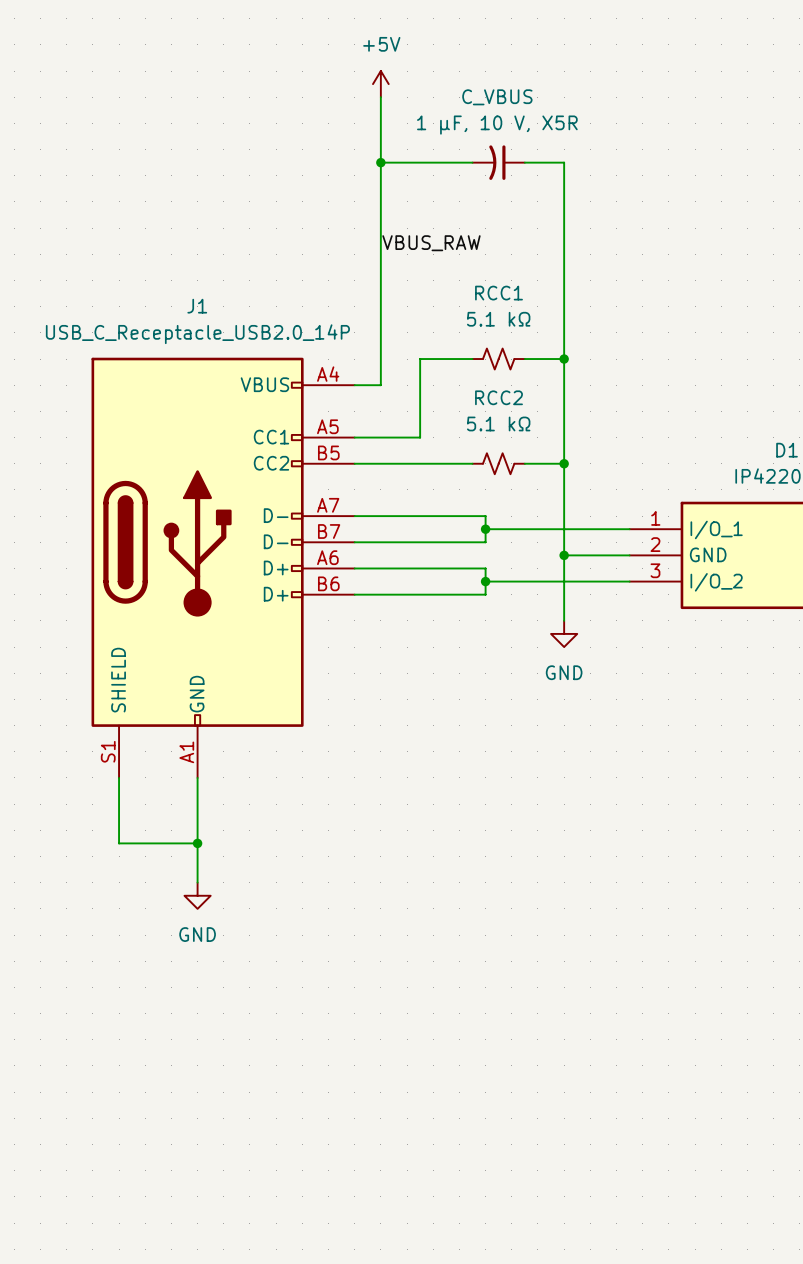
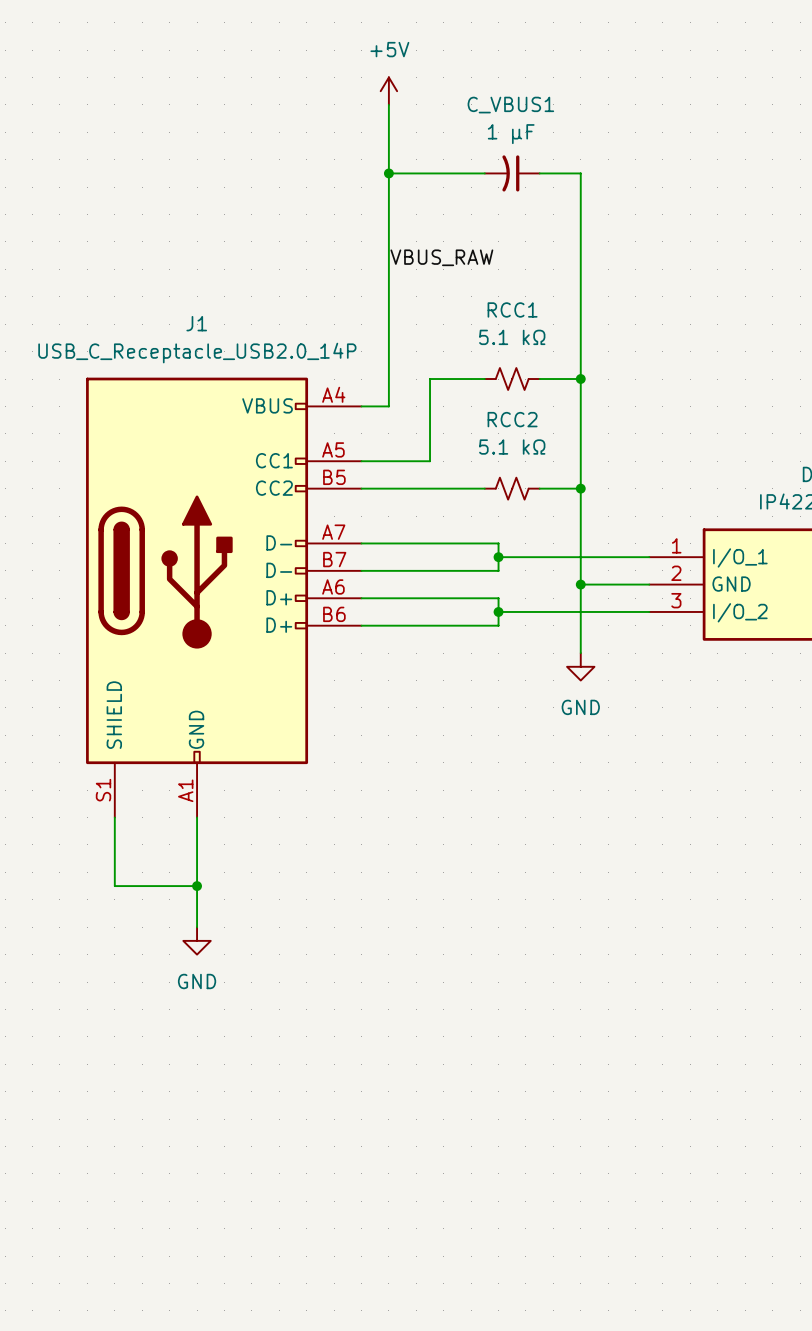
C_VBUS name: C_VBUS (497, 97) -> C_VBUS1 (510, 105)
C_VBUS value: 1 µF, 10 V, X5R (497, 125) -> 1 µF (511, 134)

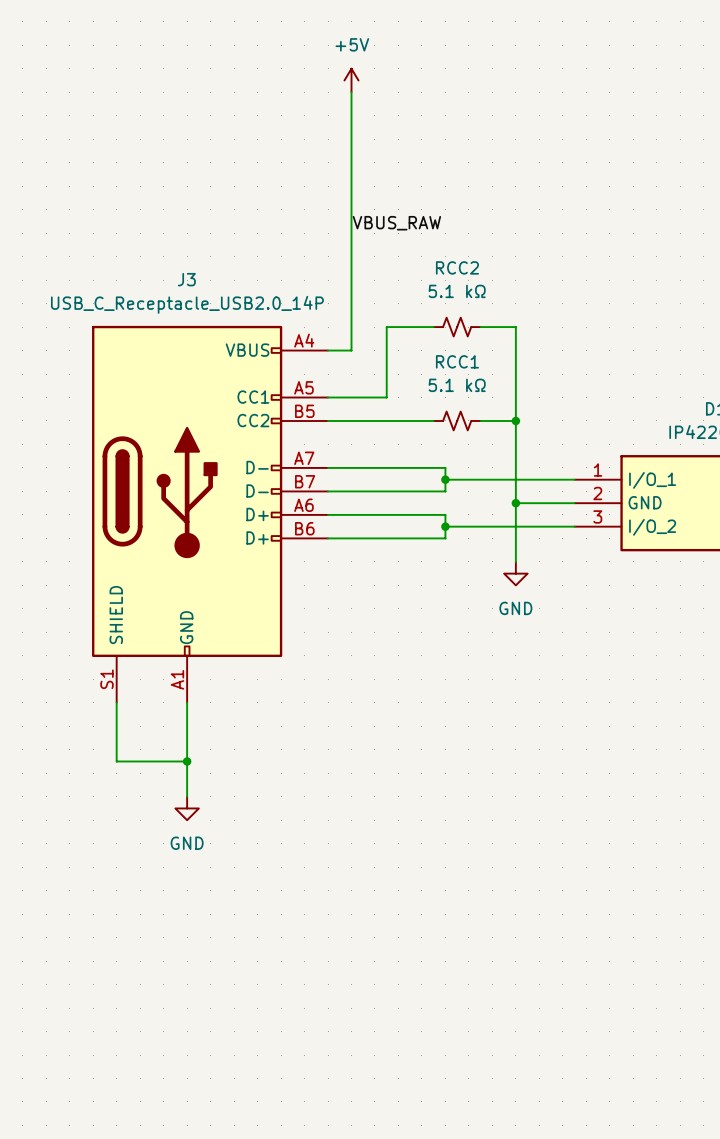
wire: (388, 173) (484, 173) -> none
junction: (388, 173) -> none
C_VBUS1: 1 µF (512, 173) -> none
wire: (539, 173) (580, 173) (580, 379) -> none
RCC1 name: RCC1 (512, 309) -> RCC2 (457, 267)
J1 name: J1 (196, 323) -> J3 (186, 279)
junction: (580, 379) -> none
RCC2 name: RCC2 (512, 419) -> RCC1 (457, 361)

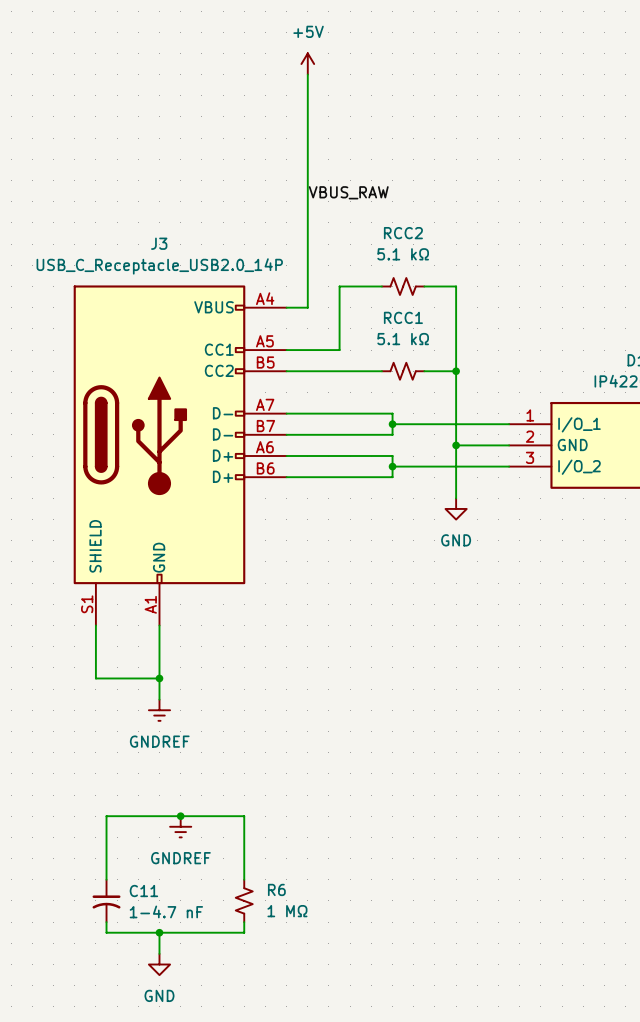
power symbol: none -> GNDREF (159, 710)
power symbol: GND (187, 808) -> none
junction: none -> (180, 816)
power symbol: none -> GNDREF (180, 826)
wire: none -> (106, 879) (106, 816) (244, 816) (244, 879)
C11: none -> 1-4.7 nF (106, 900)
R6: none -> 1 MΩ (244, 900)
wire: none -> (106, 922) (106, 932) (244, 932) (244, 922)
wire: none -> (159, 932) (159, 953)
junction: none -> (159, 932)
power symbol: none -> GND (159, 964)

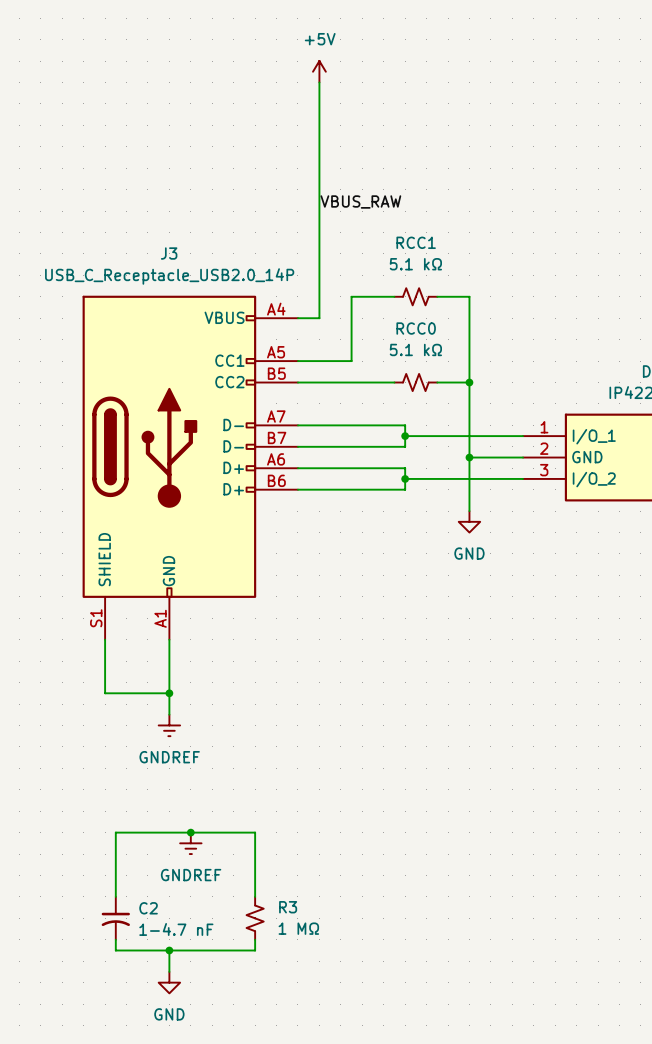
RCC2 name: RCC2 (403, 233) -> RCC1 (416, 242)
RCC1 name: RCC1 (403, 317) -> RCC0 (416, 328)
R6 name: R6 (276, 889) -> R3 (288, 907)
C11 name: C11 (143, 891) -> C2 (148, 908)

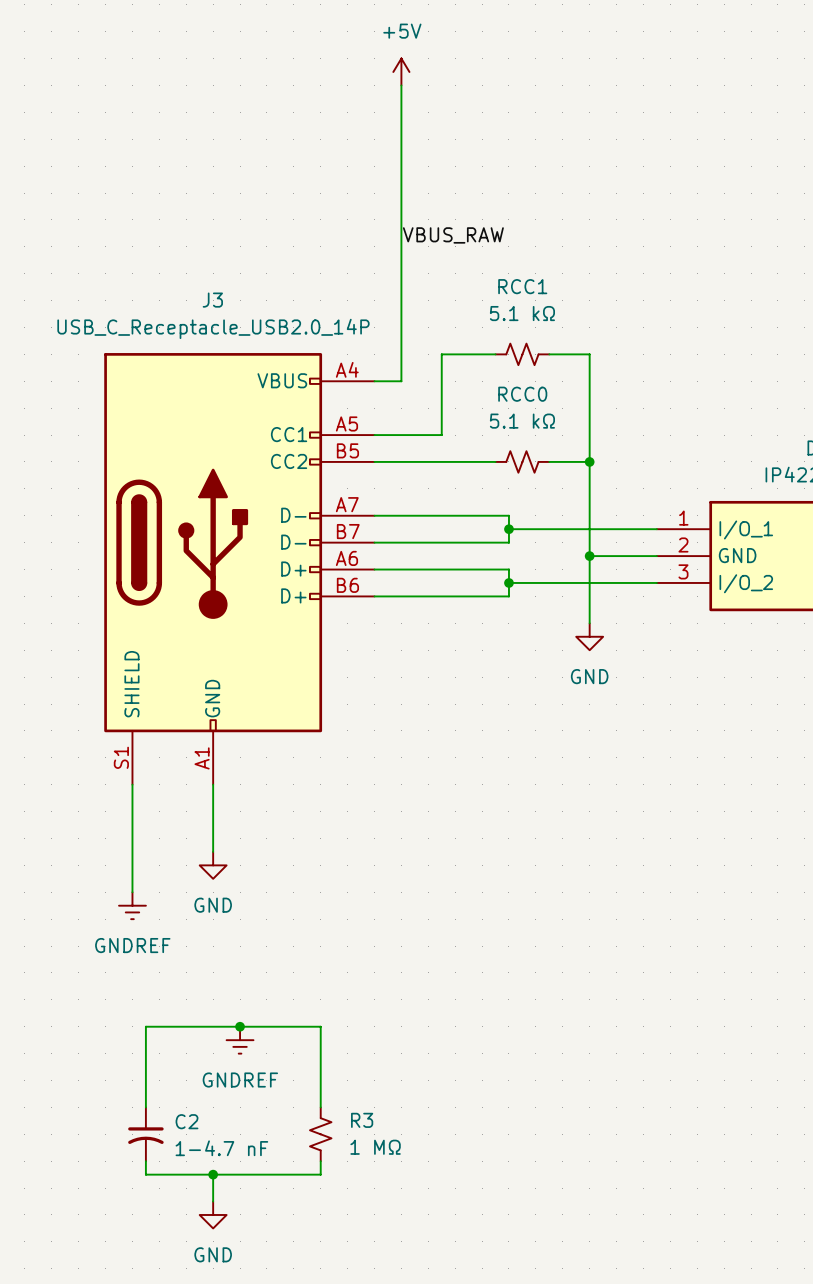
wire: (105, 693) (169, 693) (169, 714) -> (132, 851) (132, 892)
junction: (169, 693) -> none
power symbol: none -> GND (213, 865)
power symbol position: GNDREF (169, 725) -> GNDREF (132, 905)

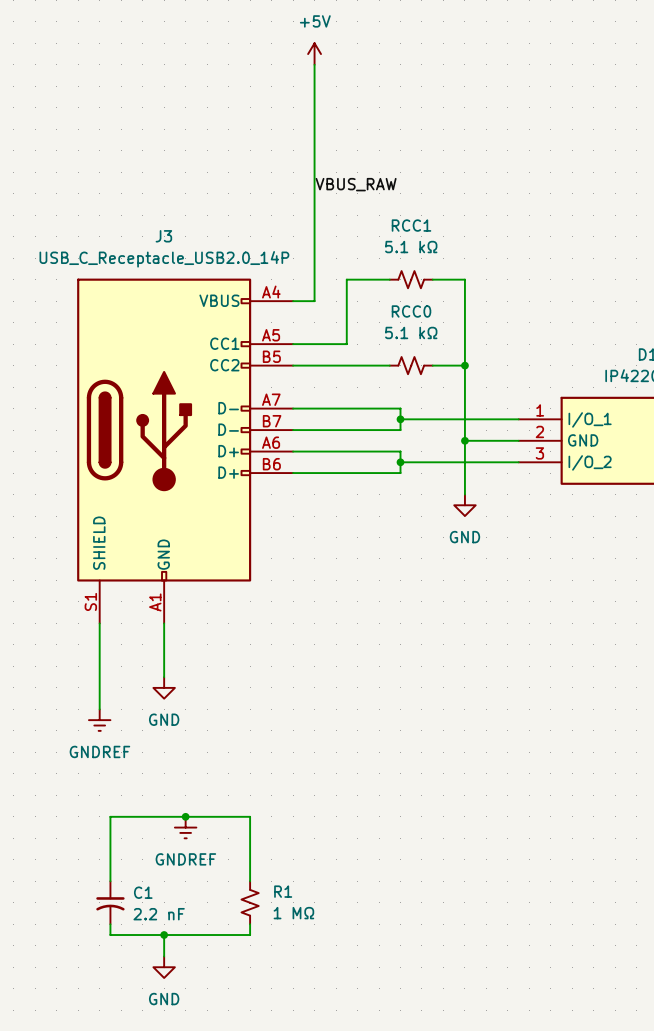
R3 name: R3 (362, 1120) -> R1 (283, 891)
C2 name: C2 (186, 1121) -> C1 (143, 892)
C2 value: 1-4.7 nF (221, 1148) -> 2.2 nF (159, 914)

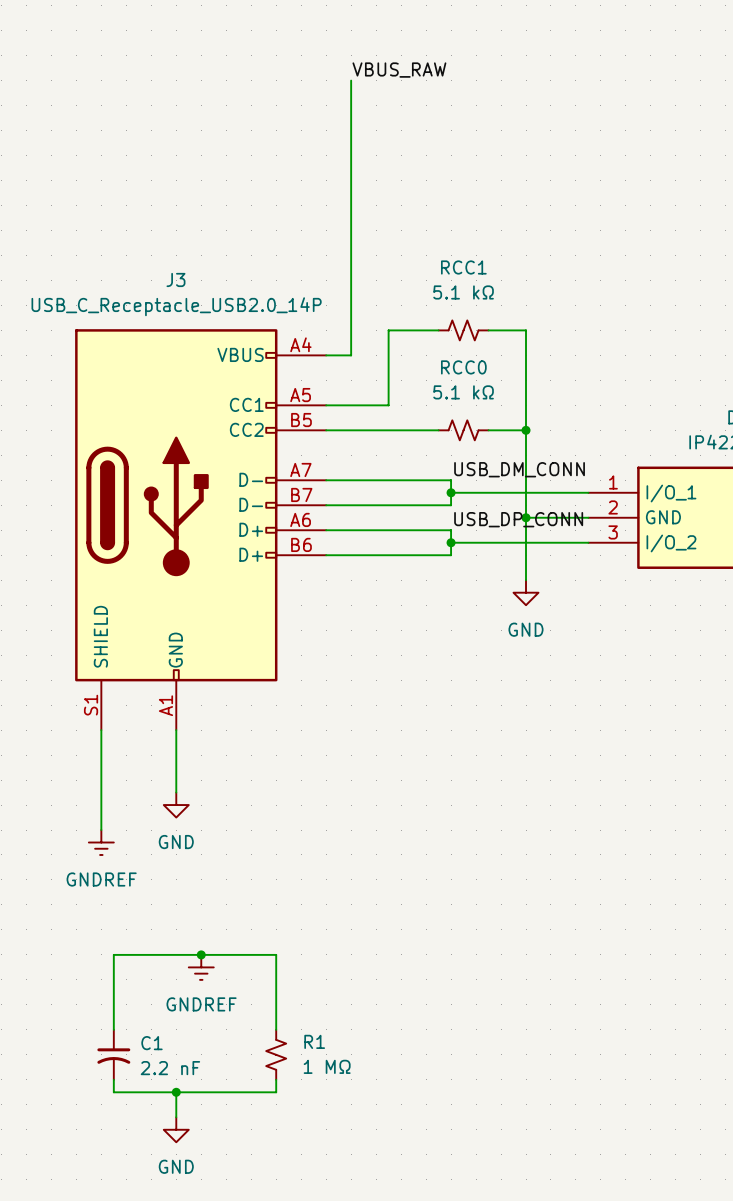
power symbol: +5V (314, 54) -> none
label position: VBUS_RAW (356, 184) -> VBUS_RAW (399, 70)
label: none -> USB_DM_CONN (519, 469)
label: none -> USB_DP_CONN (518, 519)

